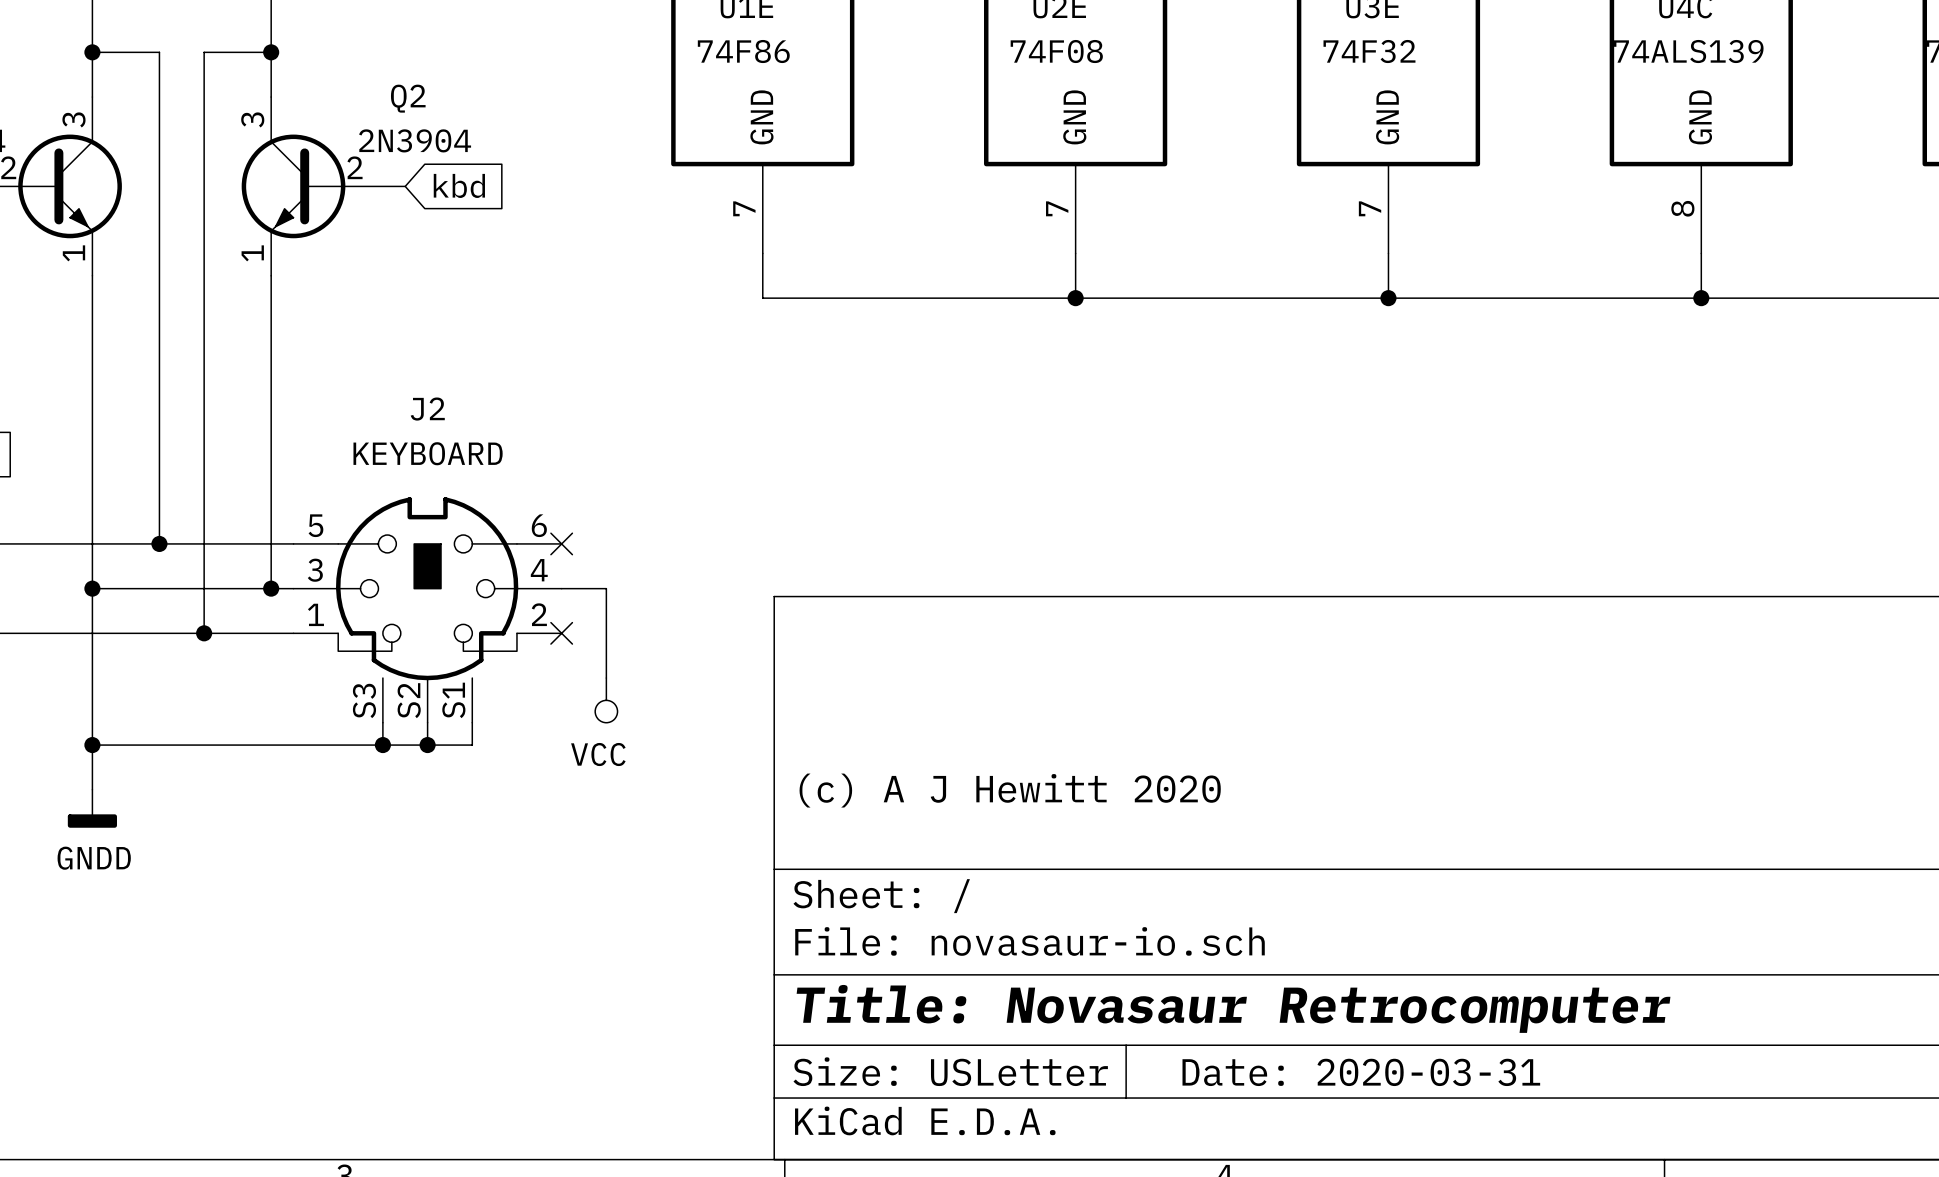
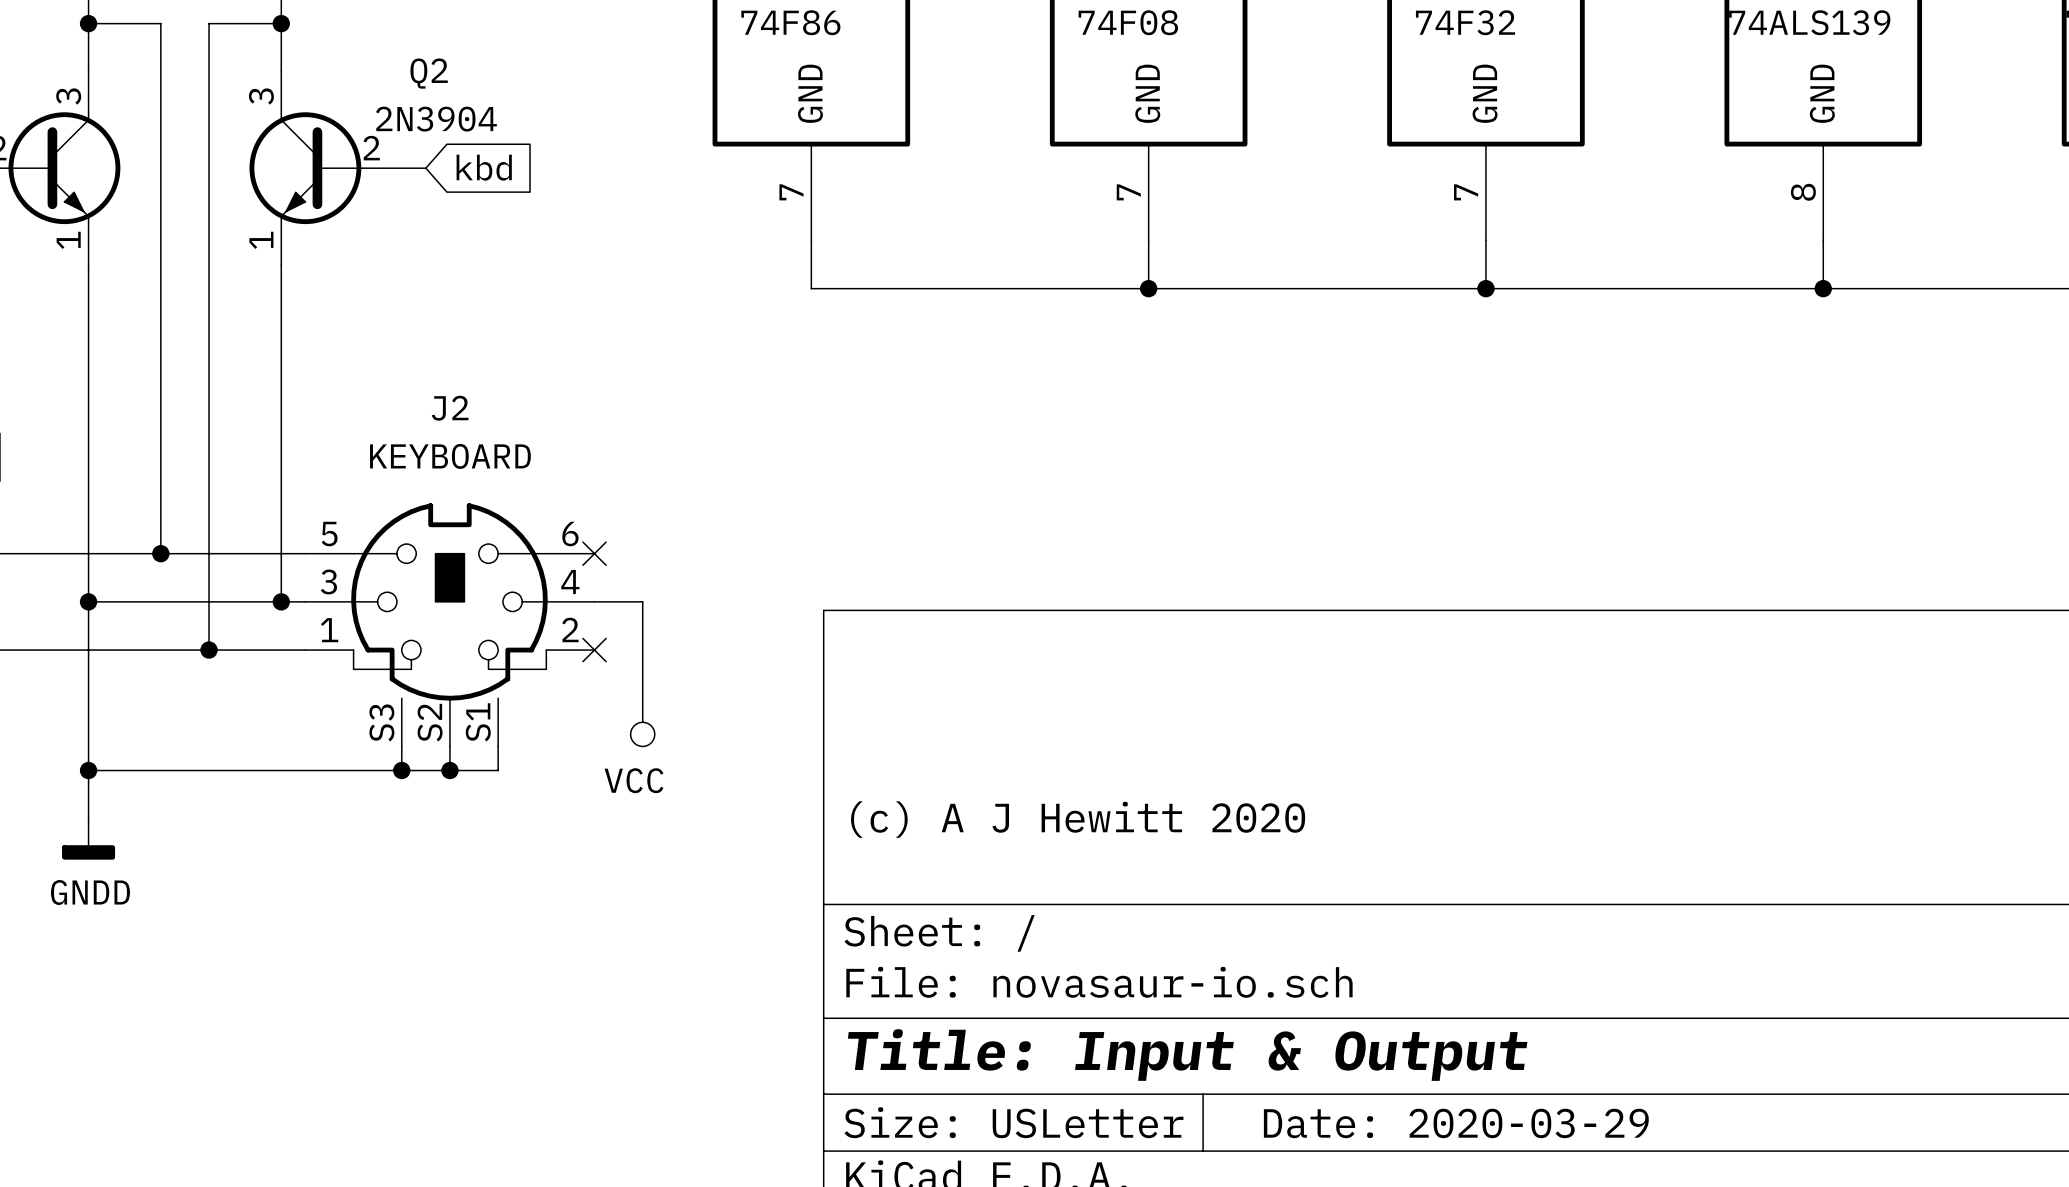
title block: Title: Novasaur Retrocomputer (1233, 1008) -> Title: Input & Output (1187, 1055)
title block: Date: 2020-03-31 (1361, 1072) -> Date: 2020-03-29 (1456, 1123)

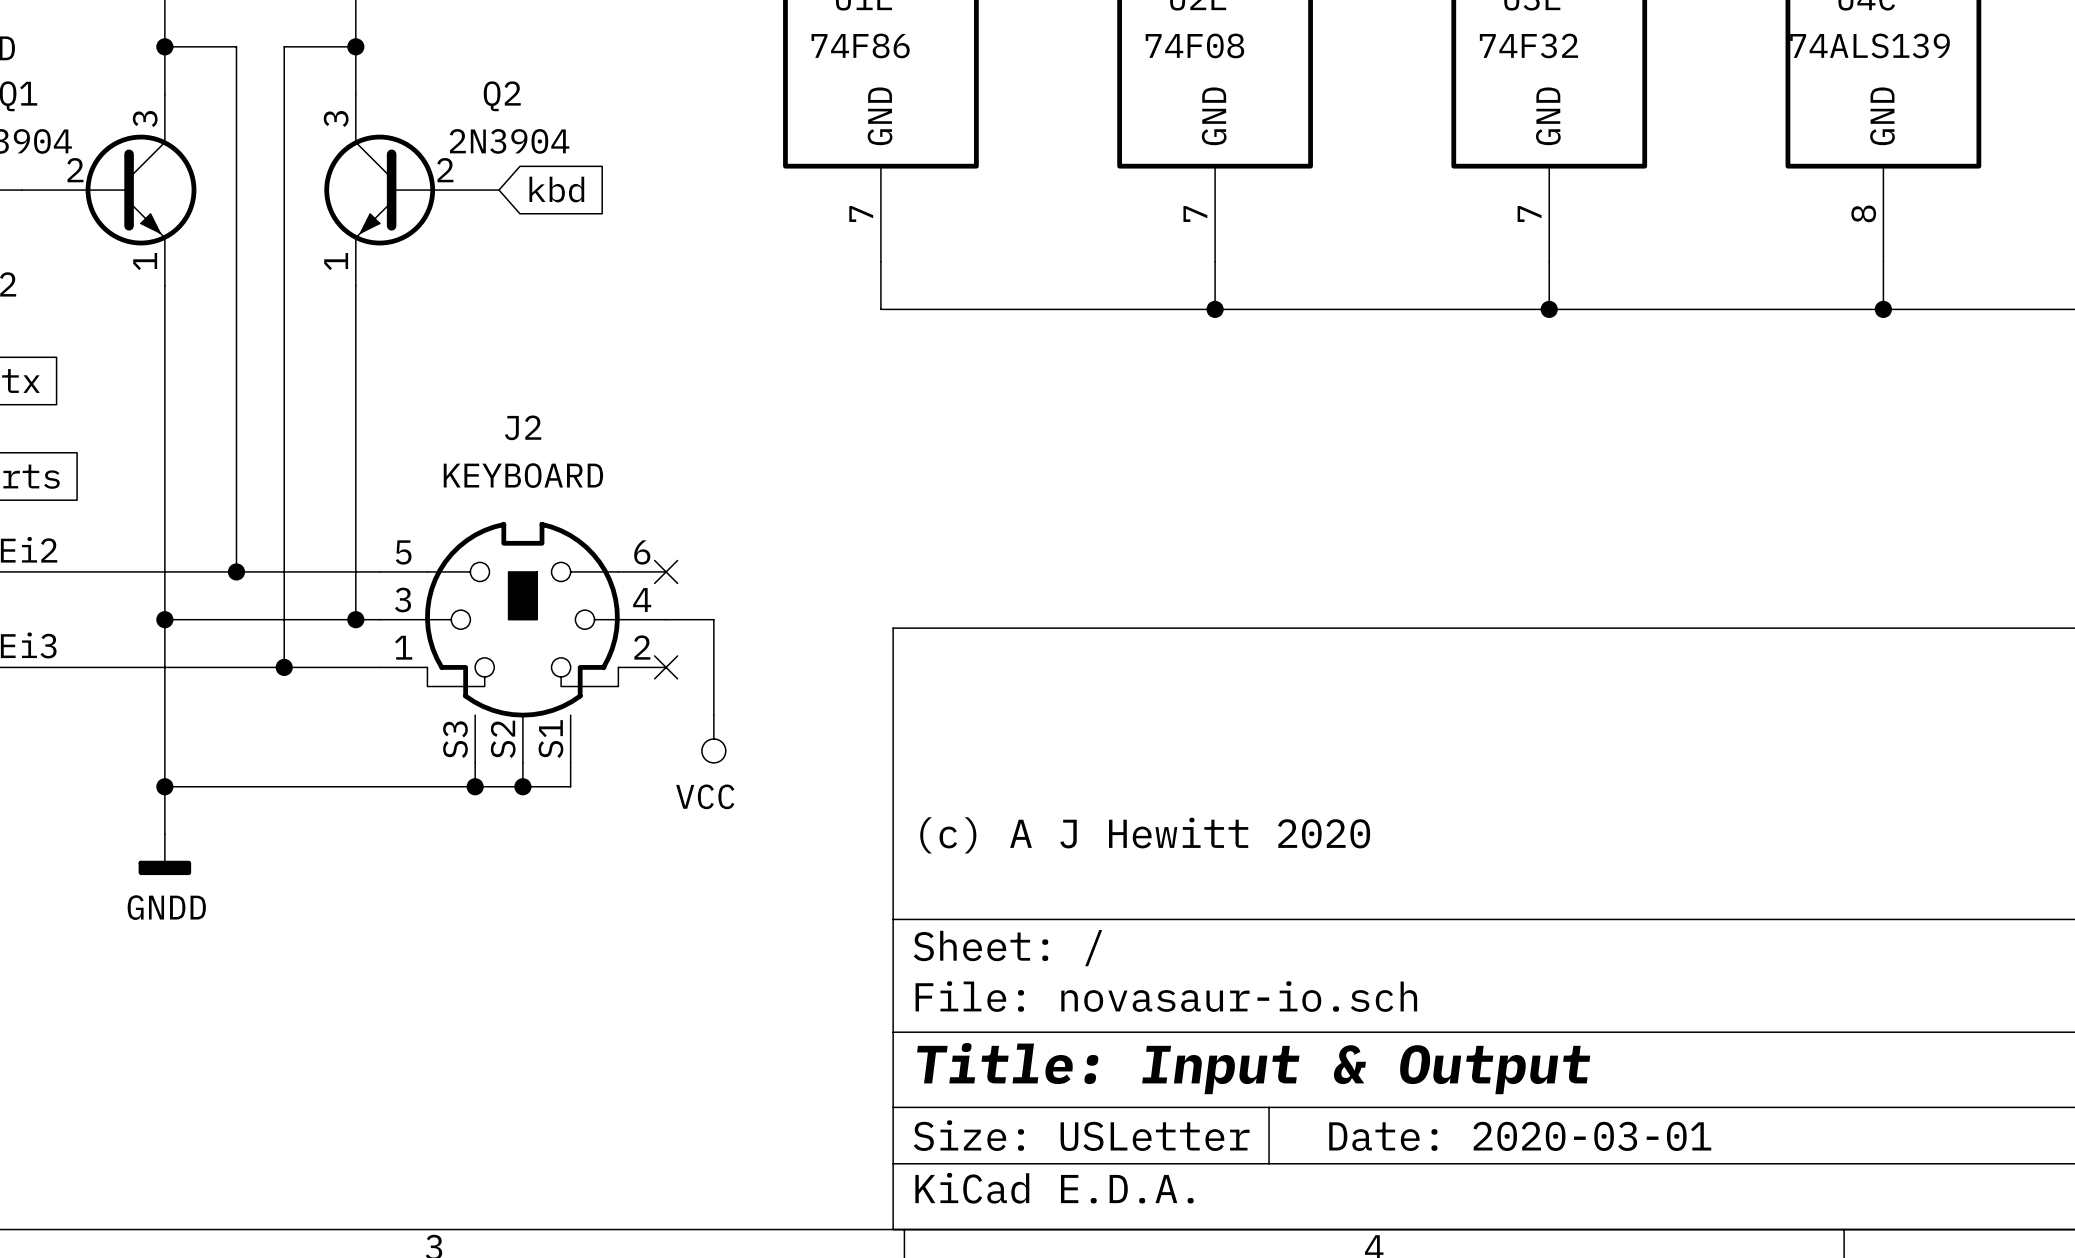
title block: Date: 2020-03-29 (1456, 1123) -> Date: 2020-03-01 (1520, 1136)

